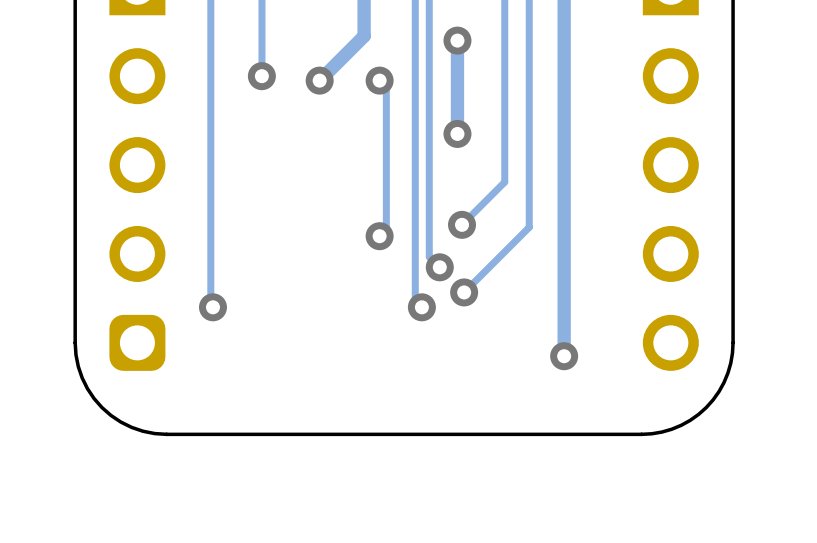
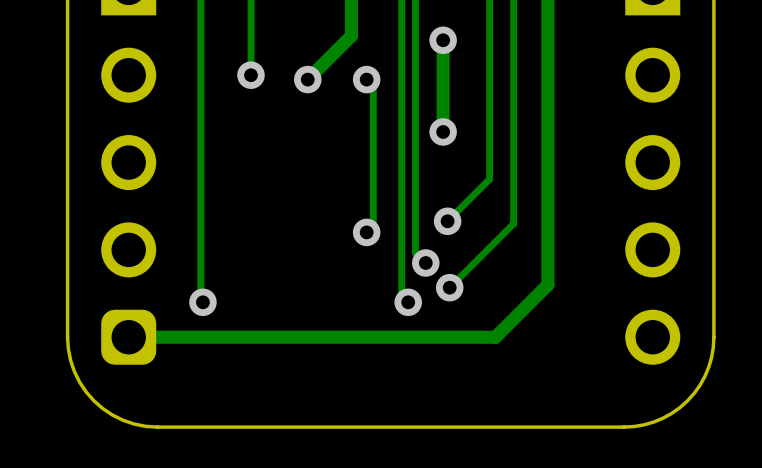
track: (564, 289) (564, 356) -> (547, 284) (495, 337) (128, 337)
via: (564, 356) -> none

